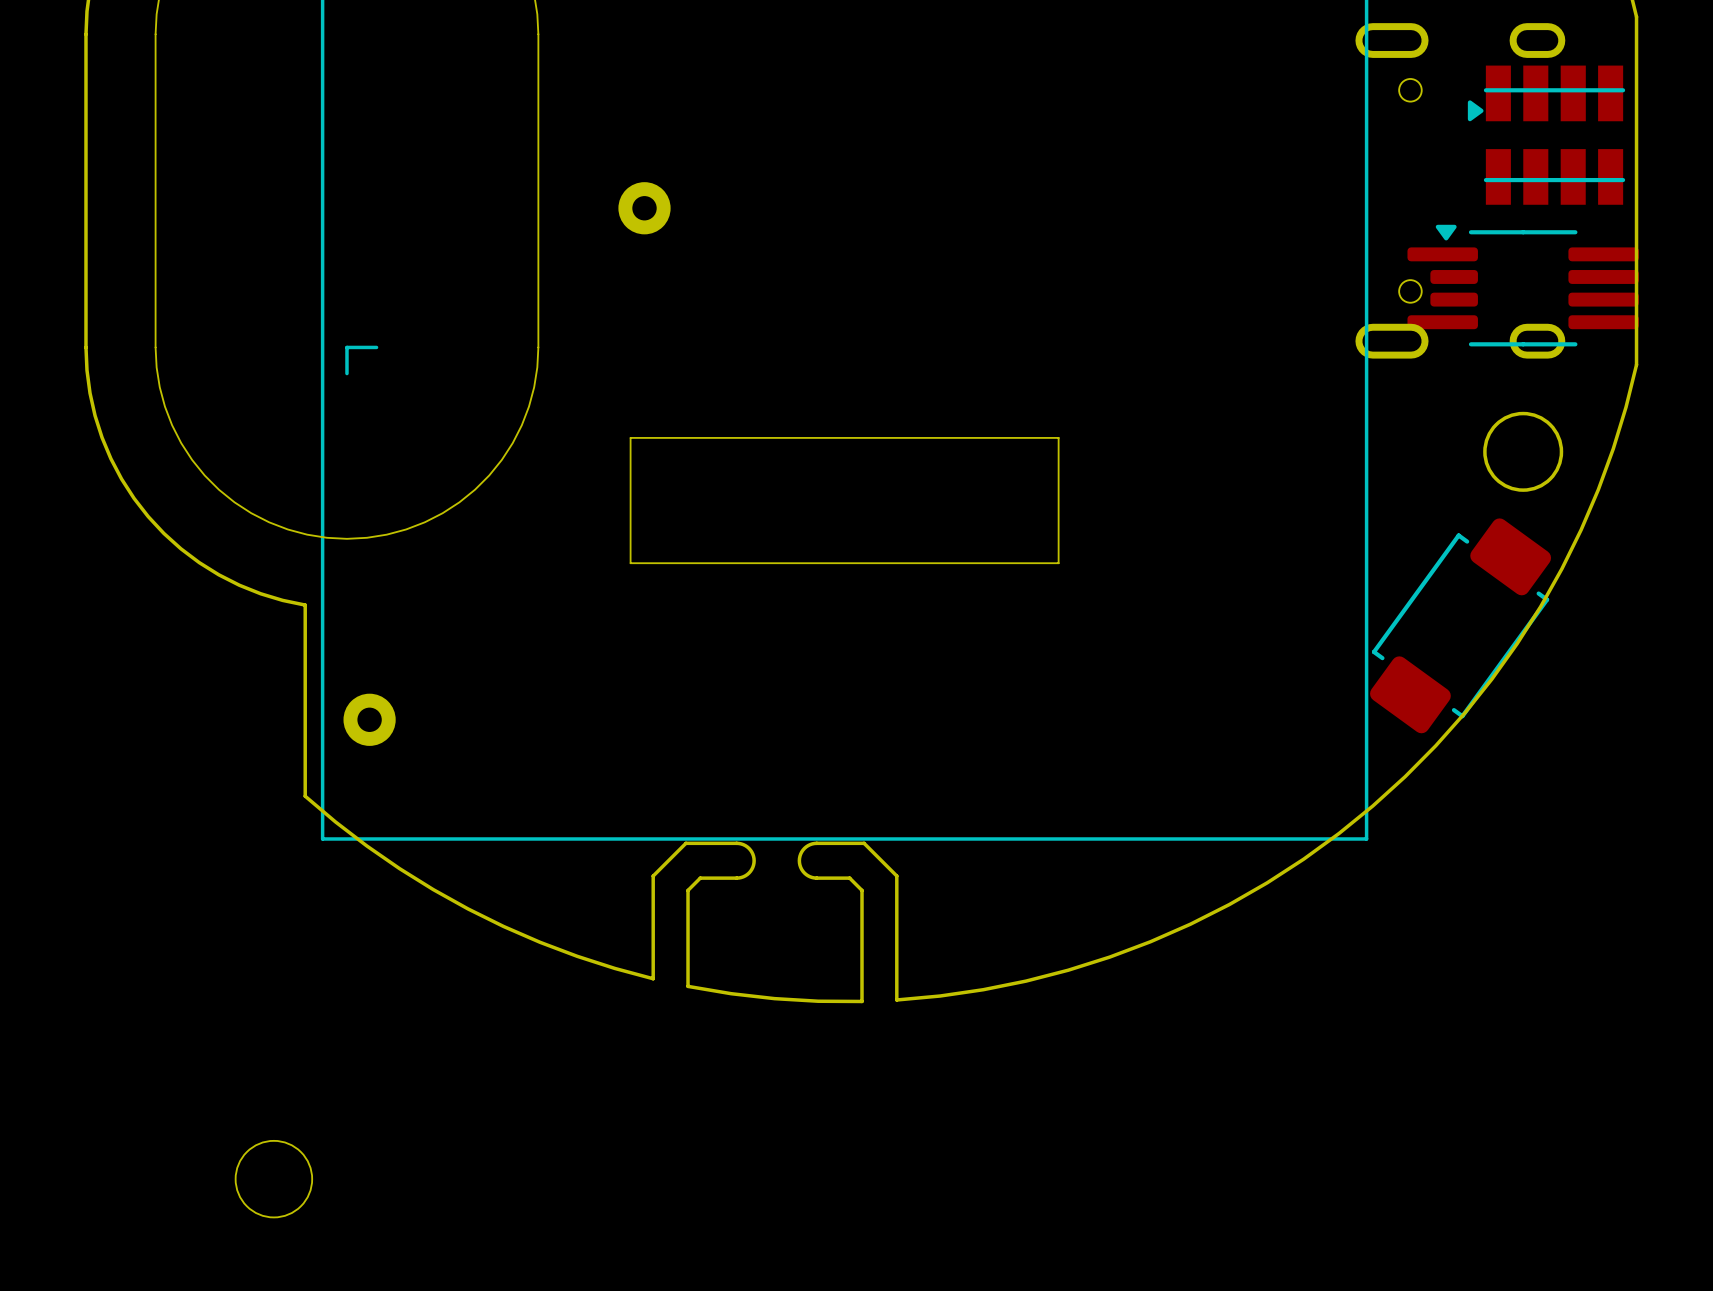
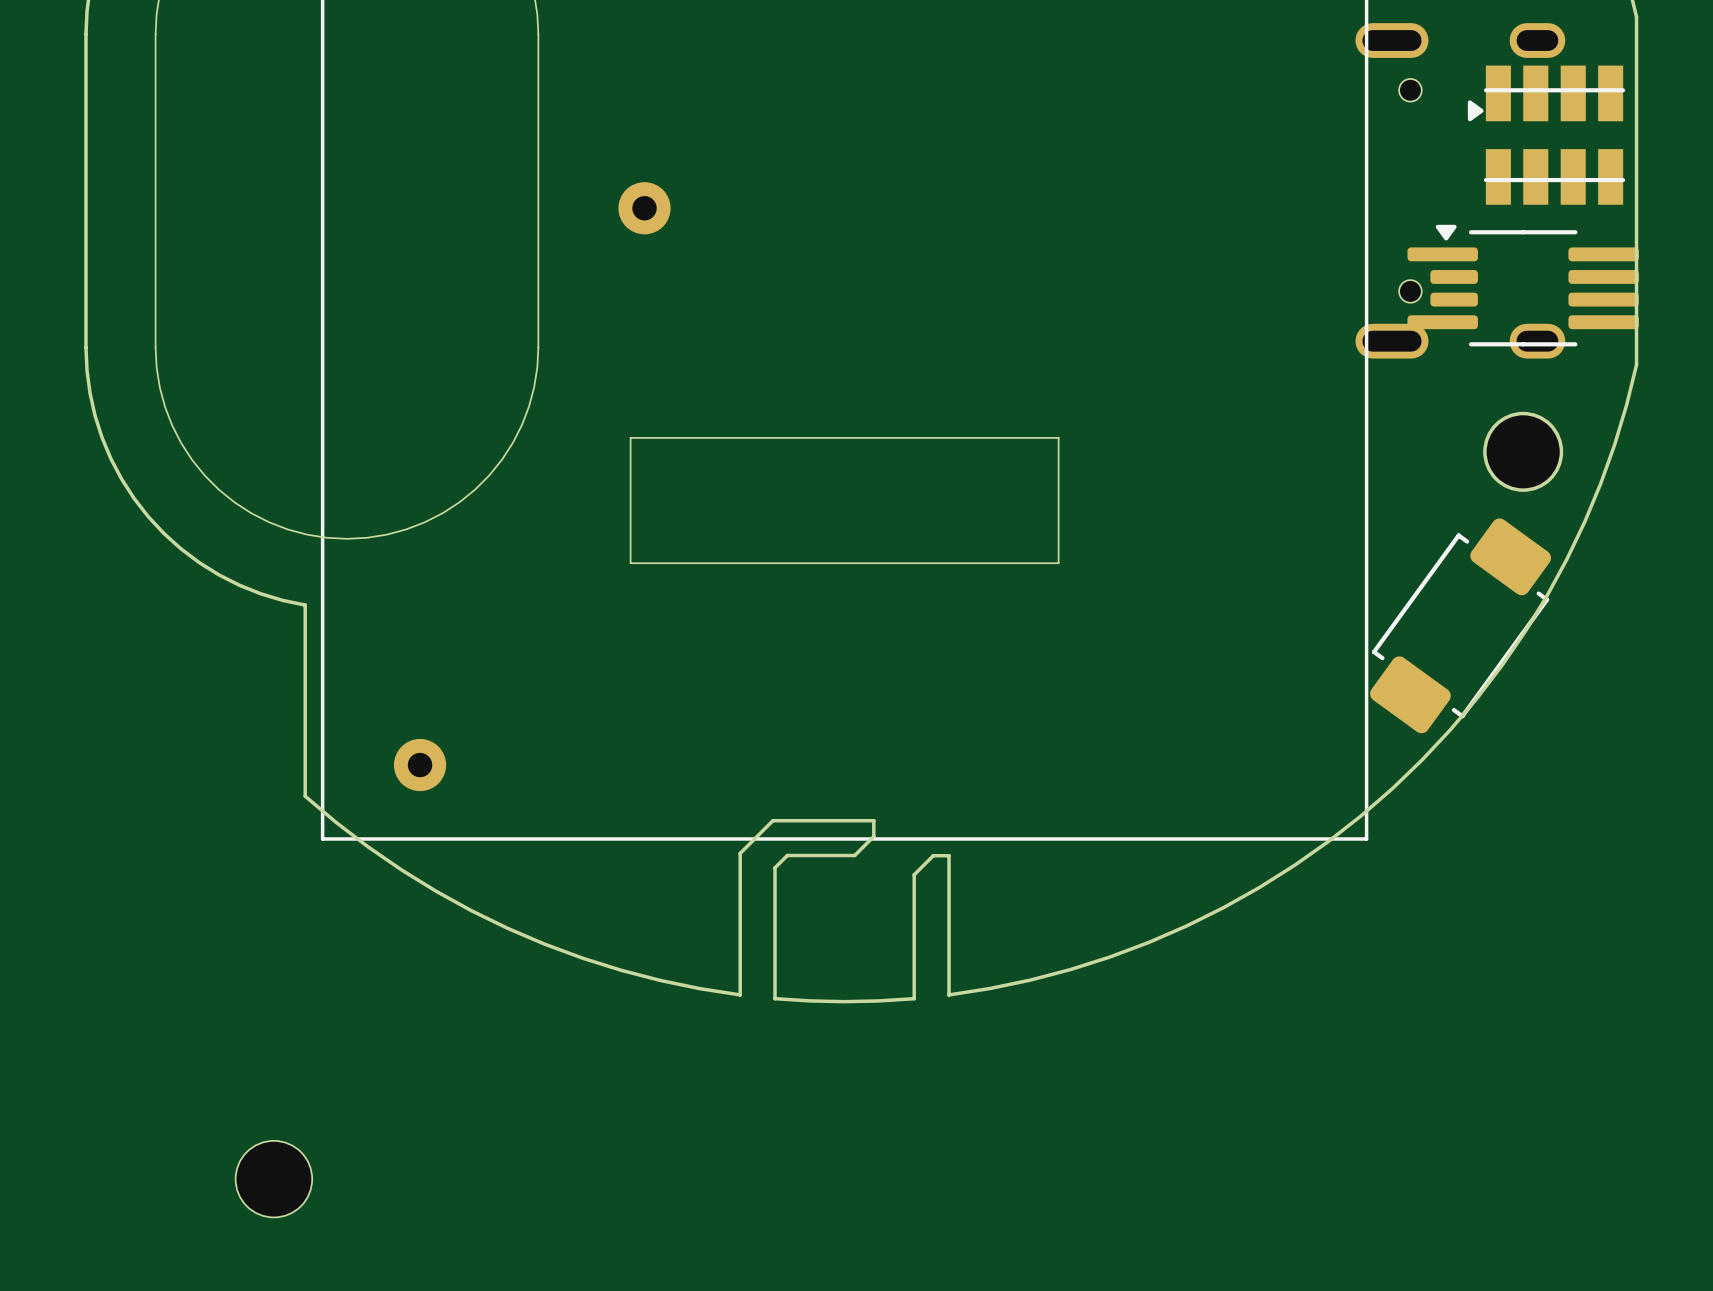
line: (376, 347) (346, 347) (346, 373) -> none
board edge: (1636, 364) (1613, 448) (1581, 529) (1540, 606) (1517, 643) (1464, 713) (1435, 745) (1372, 806) (1303, 859) (1229, 904) (1190, 924) (1109, 957) (1026, 981) (983, 989) (896, 999) (896, 876) (864, 843) (814, 843) (806, 846) (800, 854) (799, 863) (804, 873) (814, 877) (849, 878) (862, 890) (862, 1001) (774, 998) (688, 986) (688, 890) (700, 878) (739, 877) (747, 874) (752, 867) (754, 860) (751, 852) (745, 845) (736, 843) (685, 843) (653, 876) (653, 978) (614, 968) (539, 942) (467, 908) (399, 868) (366, 846) (305, 796) -> (1636, 364) (1614, 444) (1600, 483) (1566, 559) (1525, 630) (1502, 665) (1450, 729) (1392, 788) (1328, 841) (1294, 865) (1223, 907) (1186, 925) (1109, 957) (1030, 980) (949, 994) (949, 855) (933, 855) (914, 874) (914, 998) (844, 1001) (775, 998) (775, 867) (787, 855) (854, 855) (873, 836) (873, 820) (772, 820) (740, 853) (740, 994) (700, 988) (621, 970) (544, 944) (507, 928) (435, 891) (401, 869) (368, 846) (305, 796)
part position: (369, 719) -> (420, 765)

